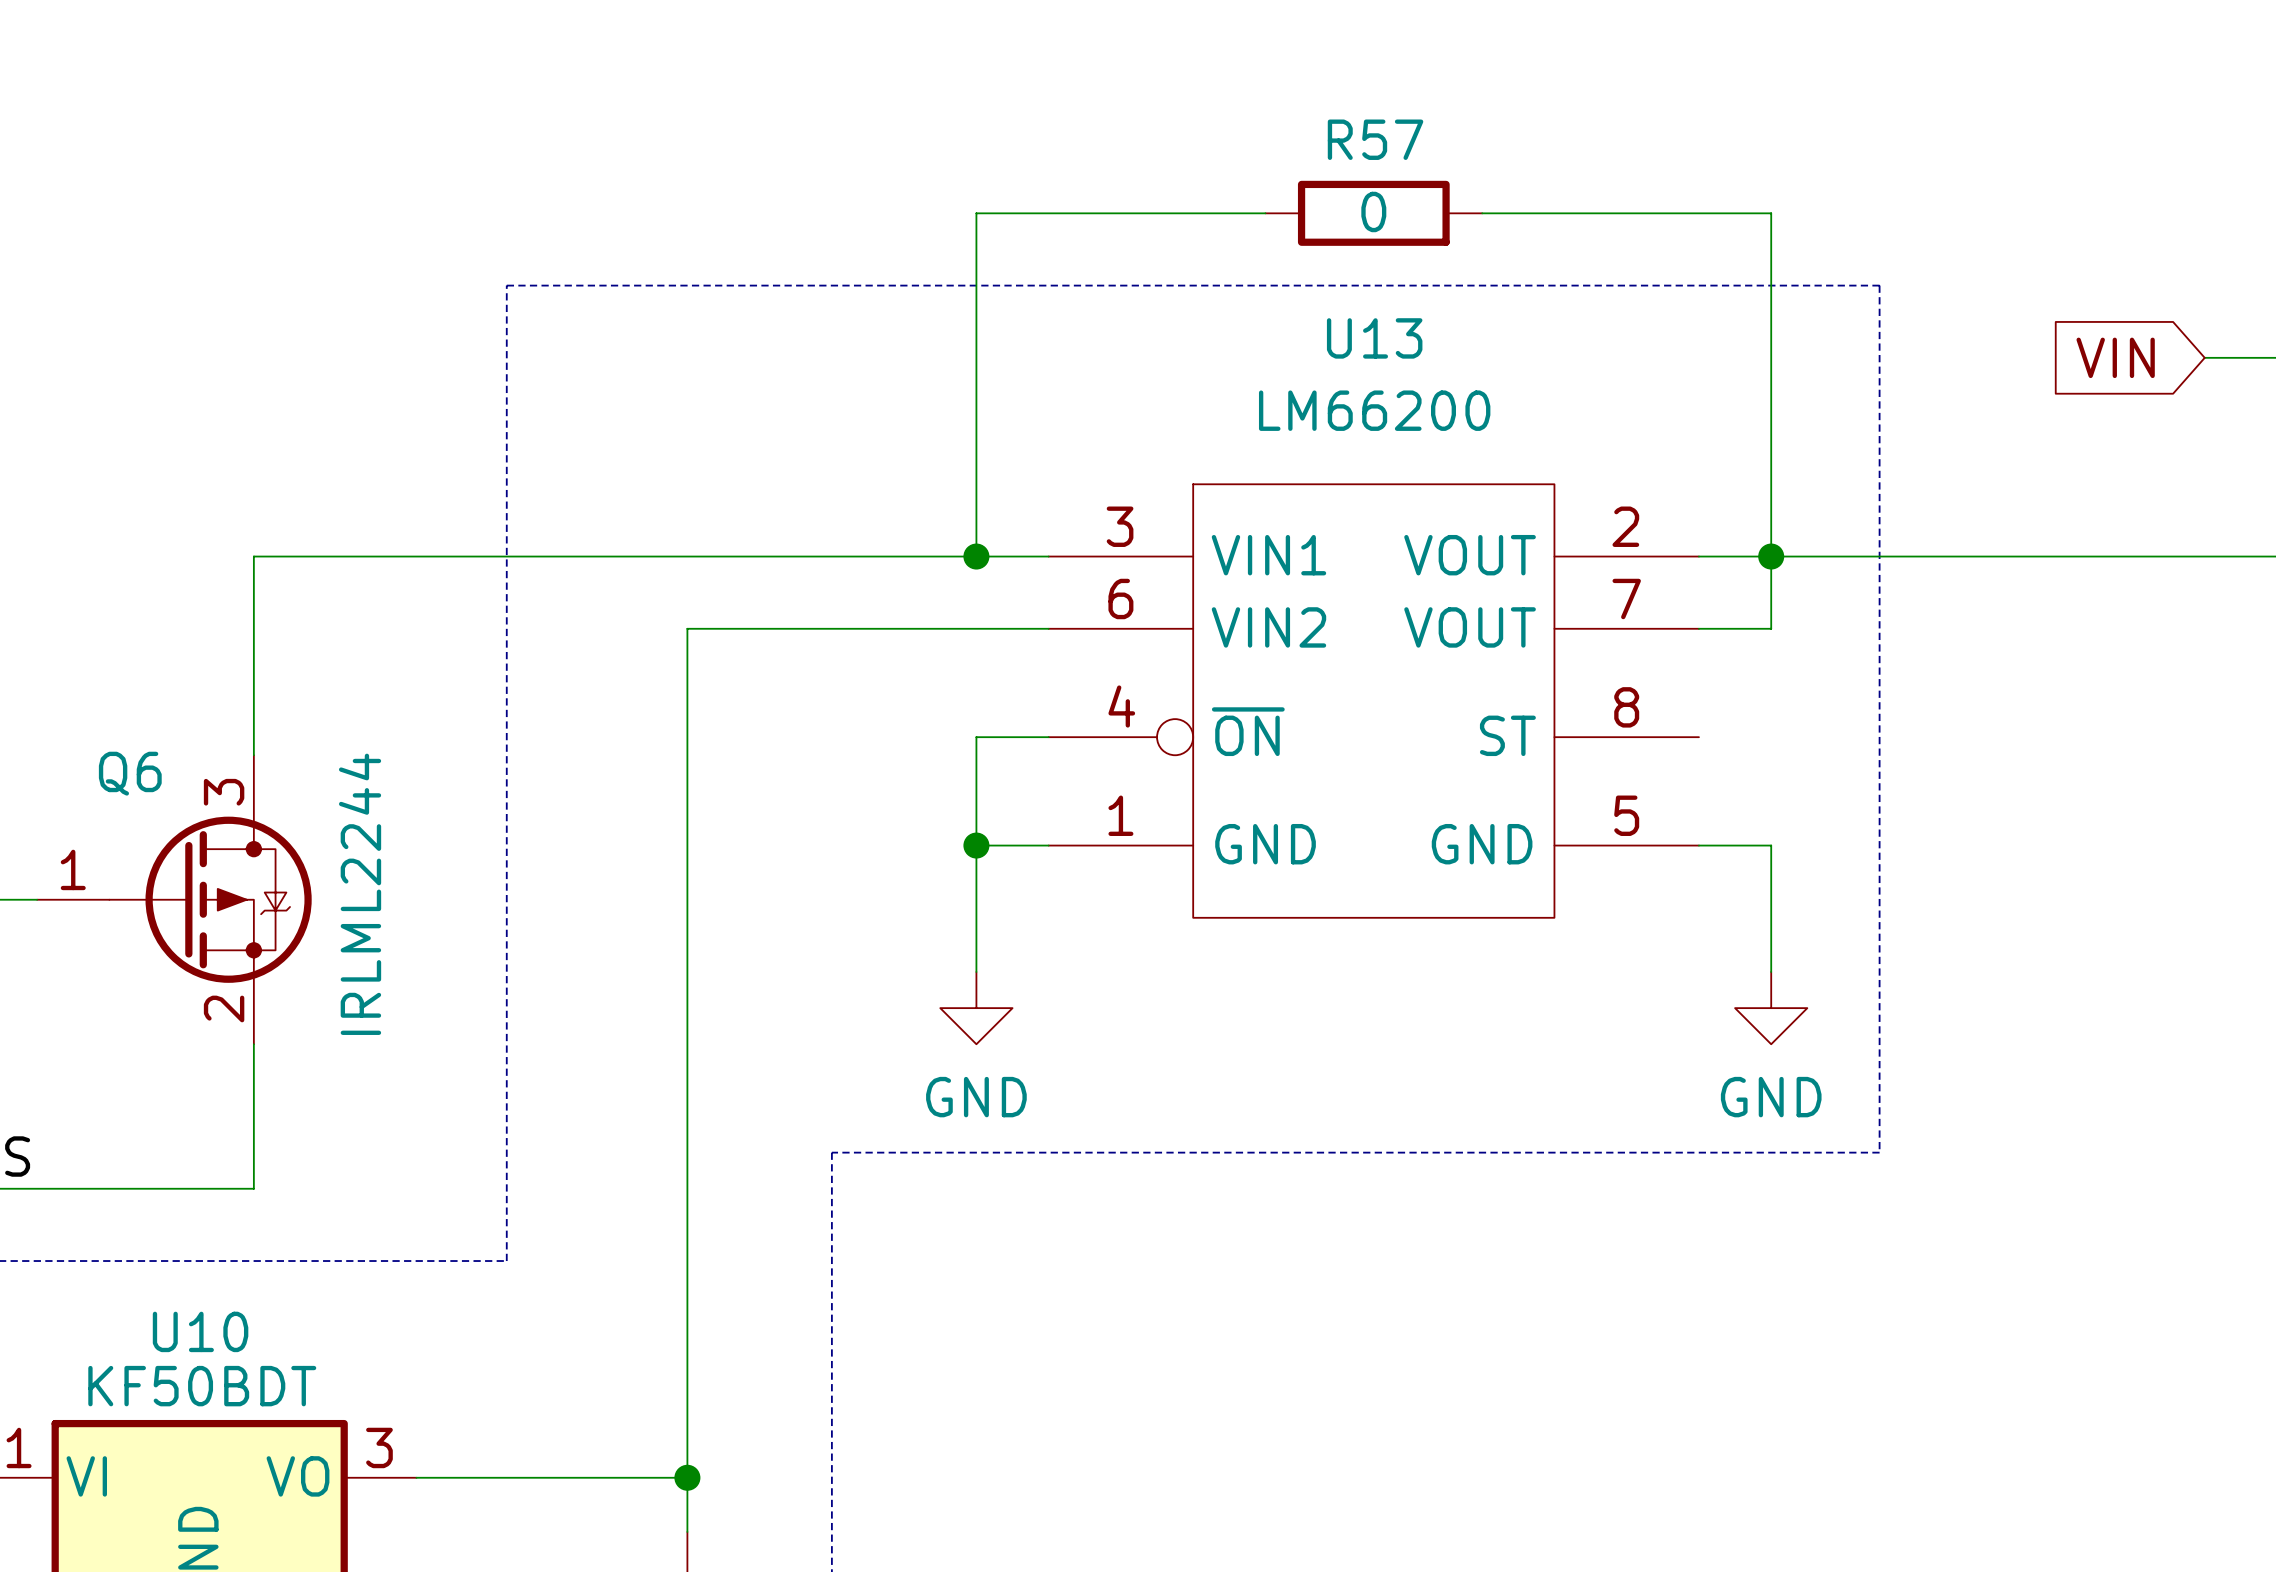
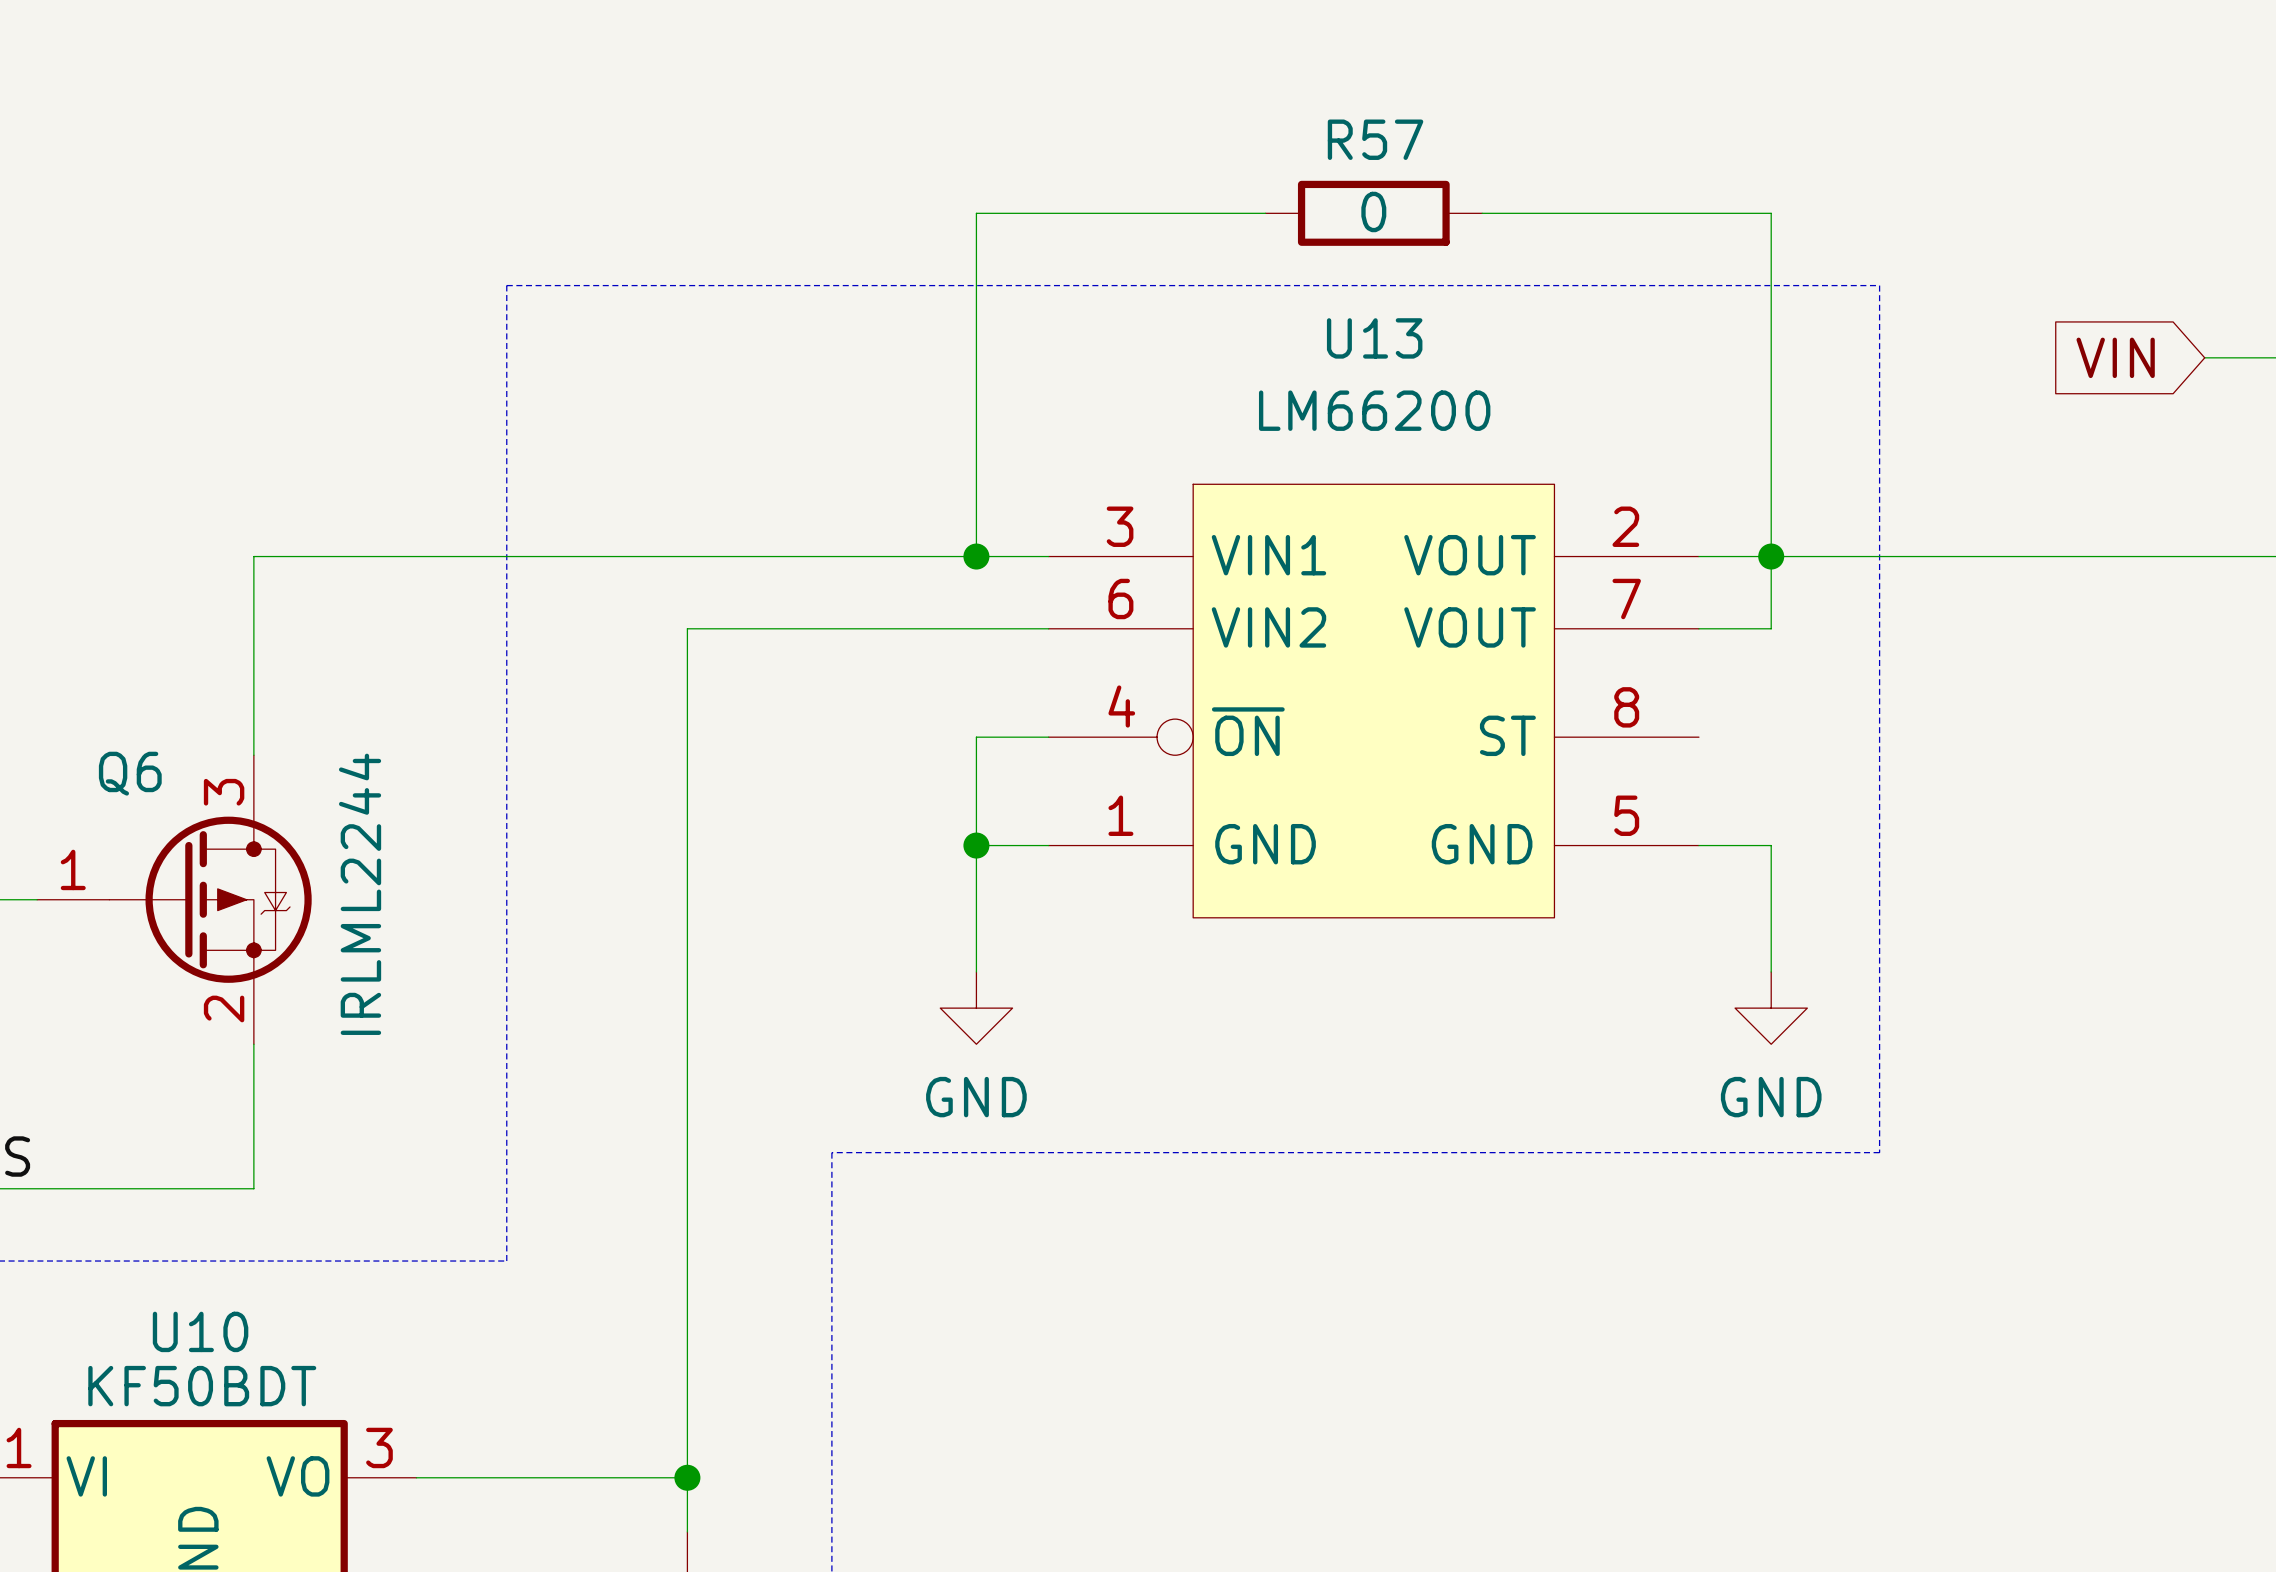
U13 symbol: [1048, 484, 1699, 918] -> [1048, 484, 1699, 918]

